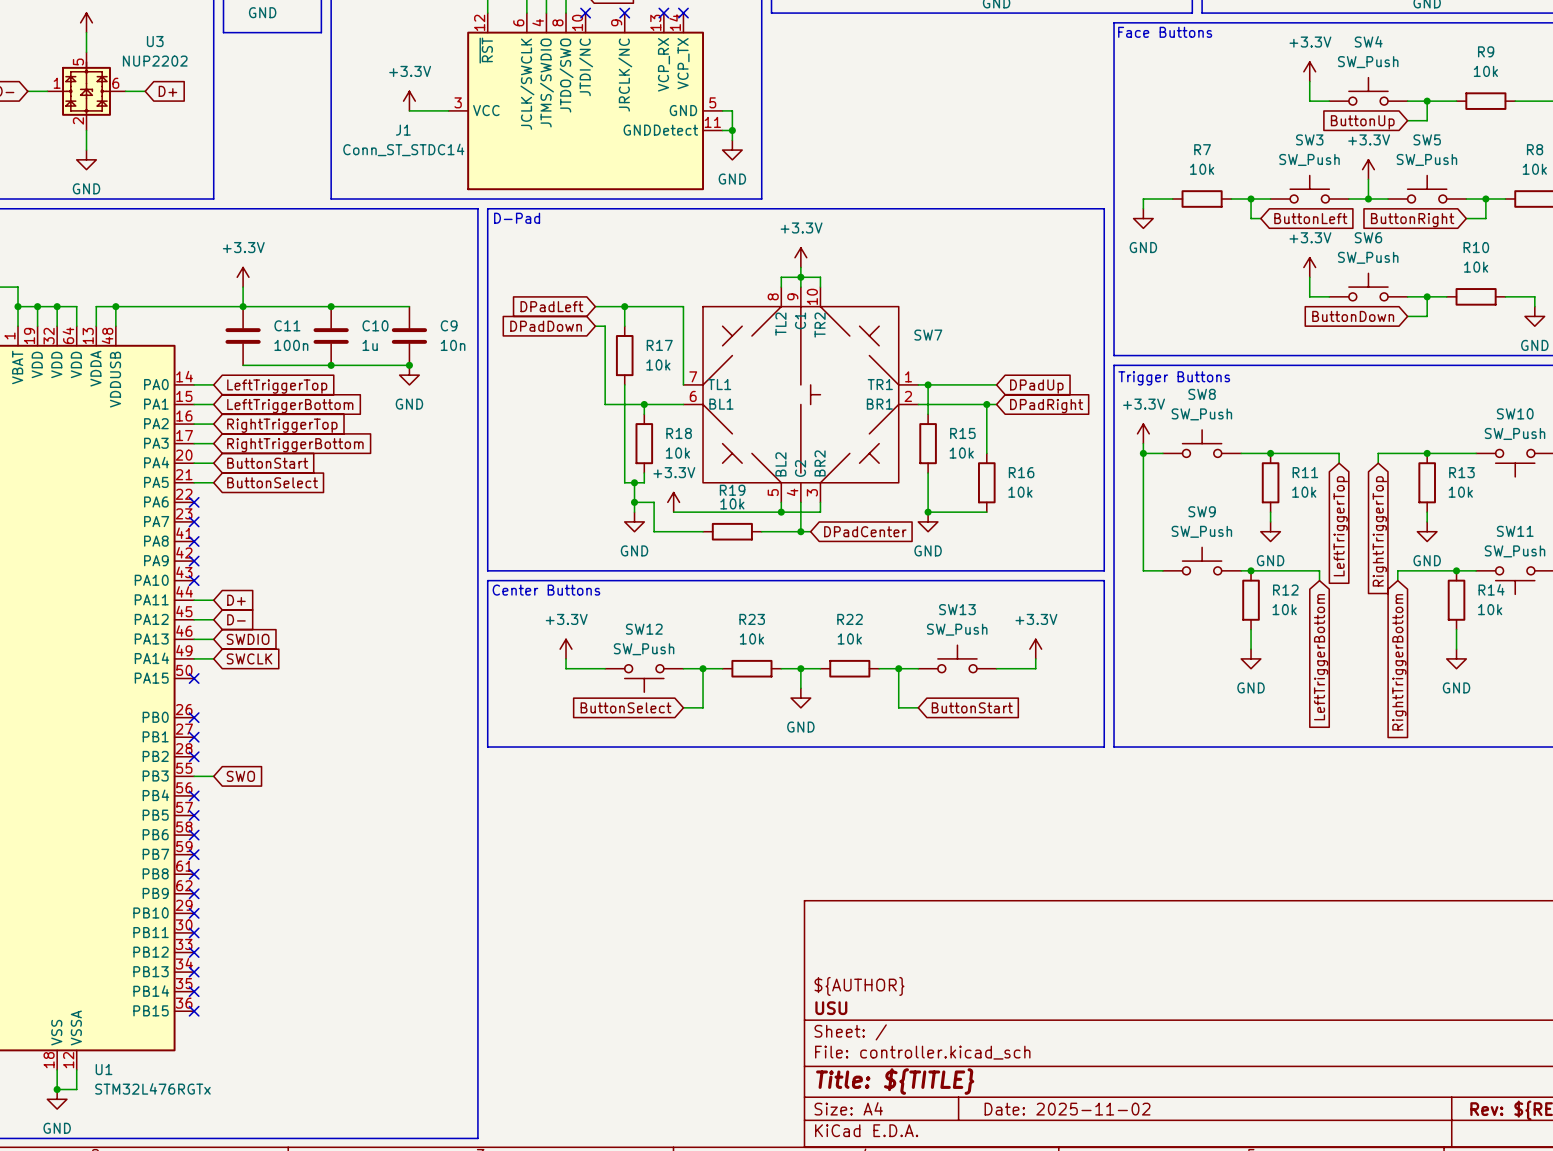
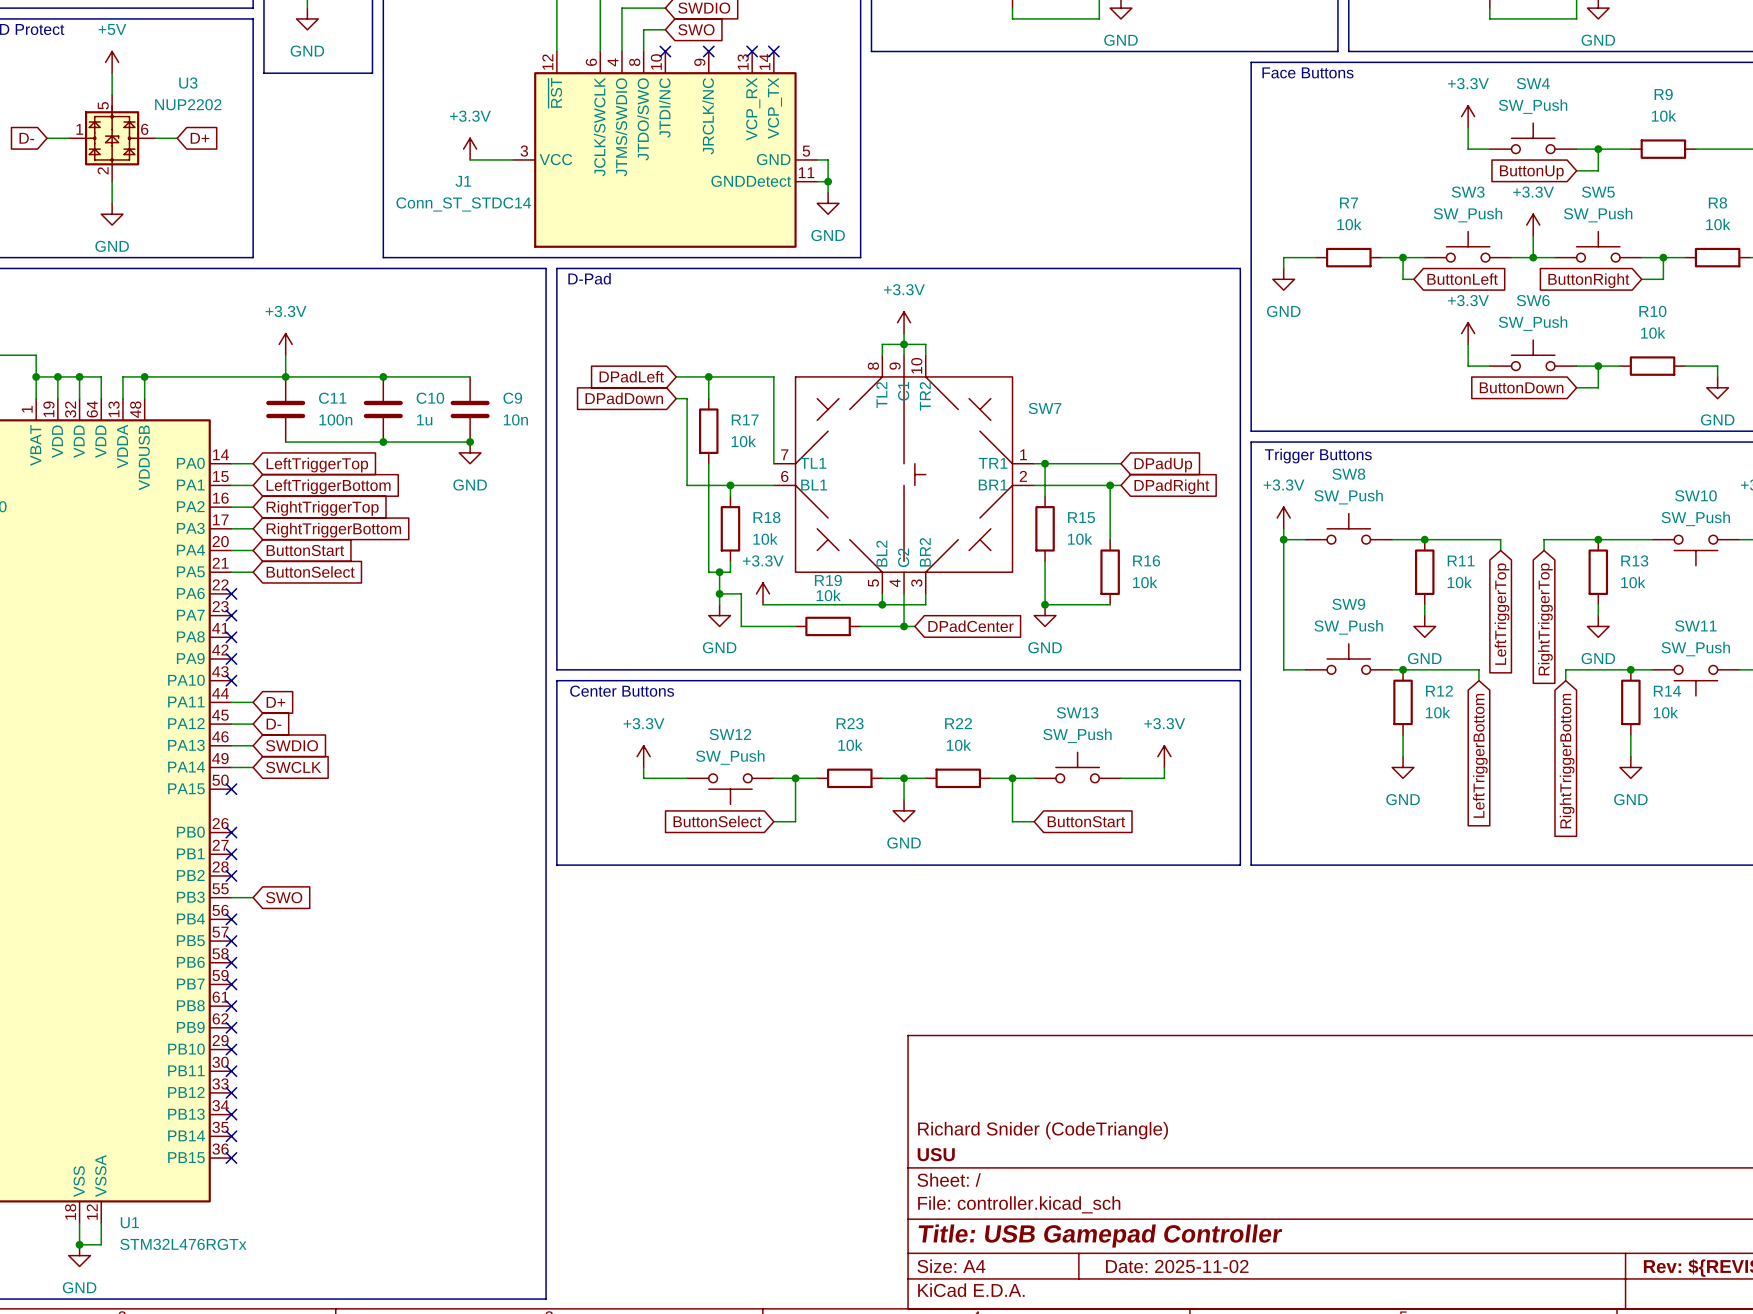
title block: ${AUTHOR} (859, 986) -> Richard Snider (CodeTriangle) (1043, 1130)
title block: Title: ${TITLE} (895, 1081) -> Title: USB Gamepad Controller (1100, 1236)

